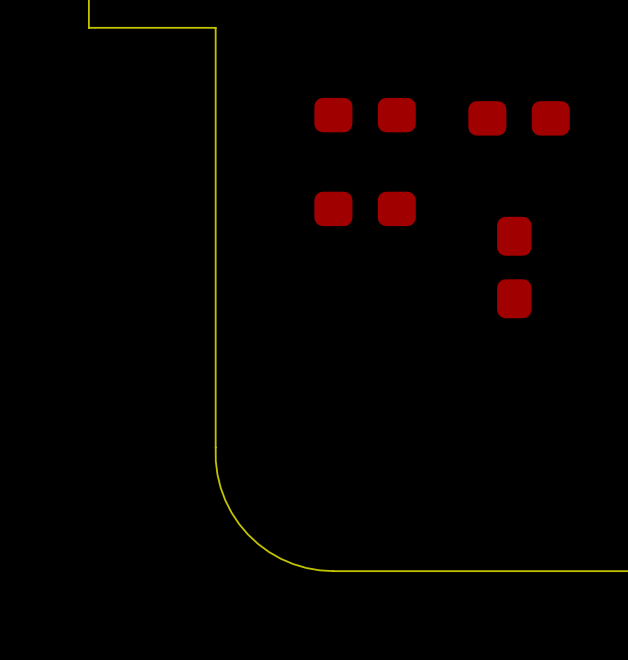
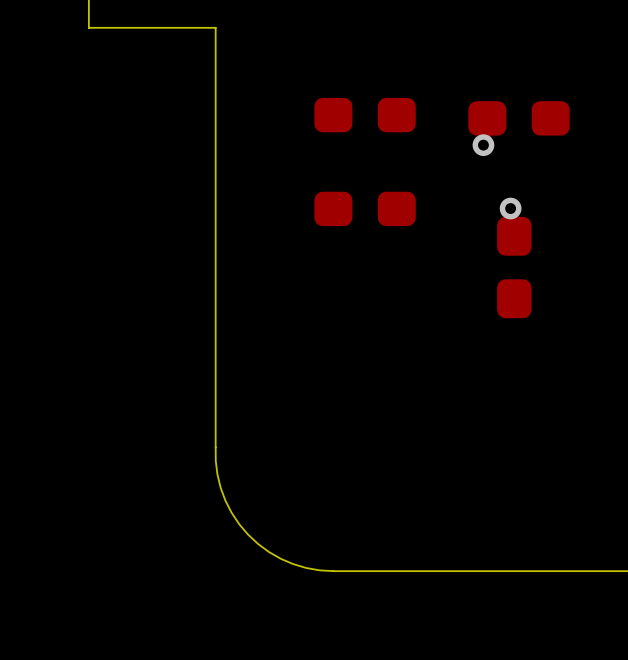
via: none -> (483, 145)
via: none -> (510, 208)

